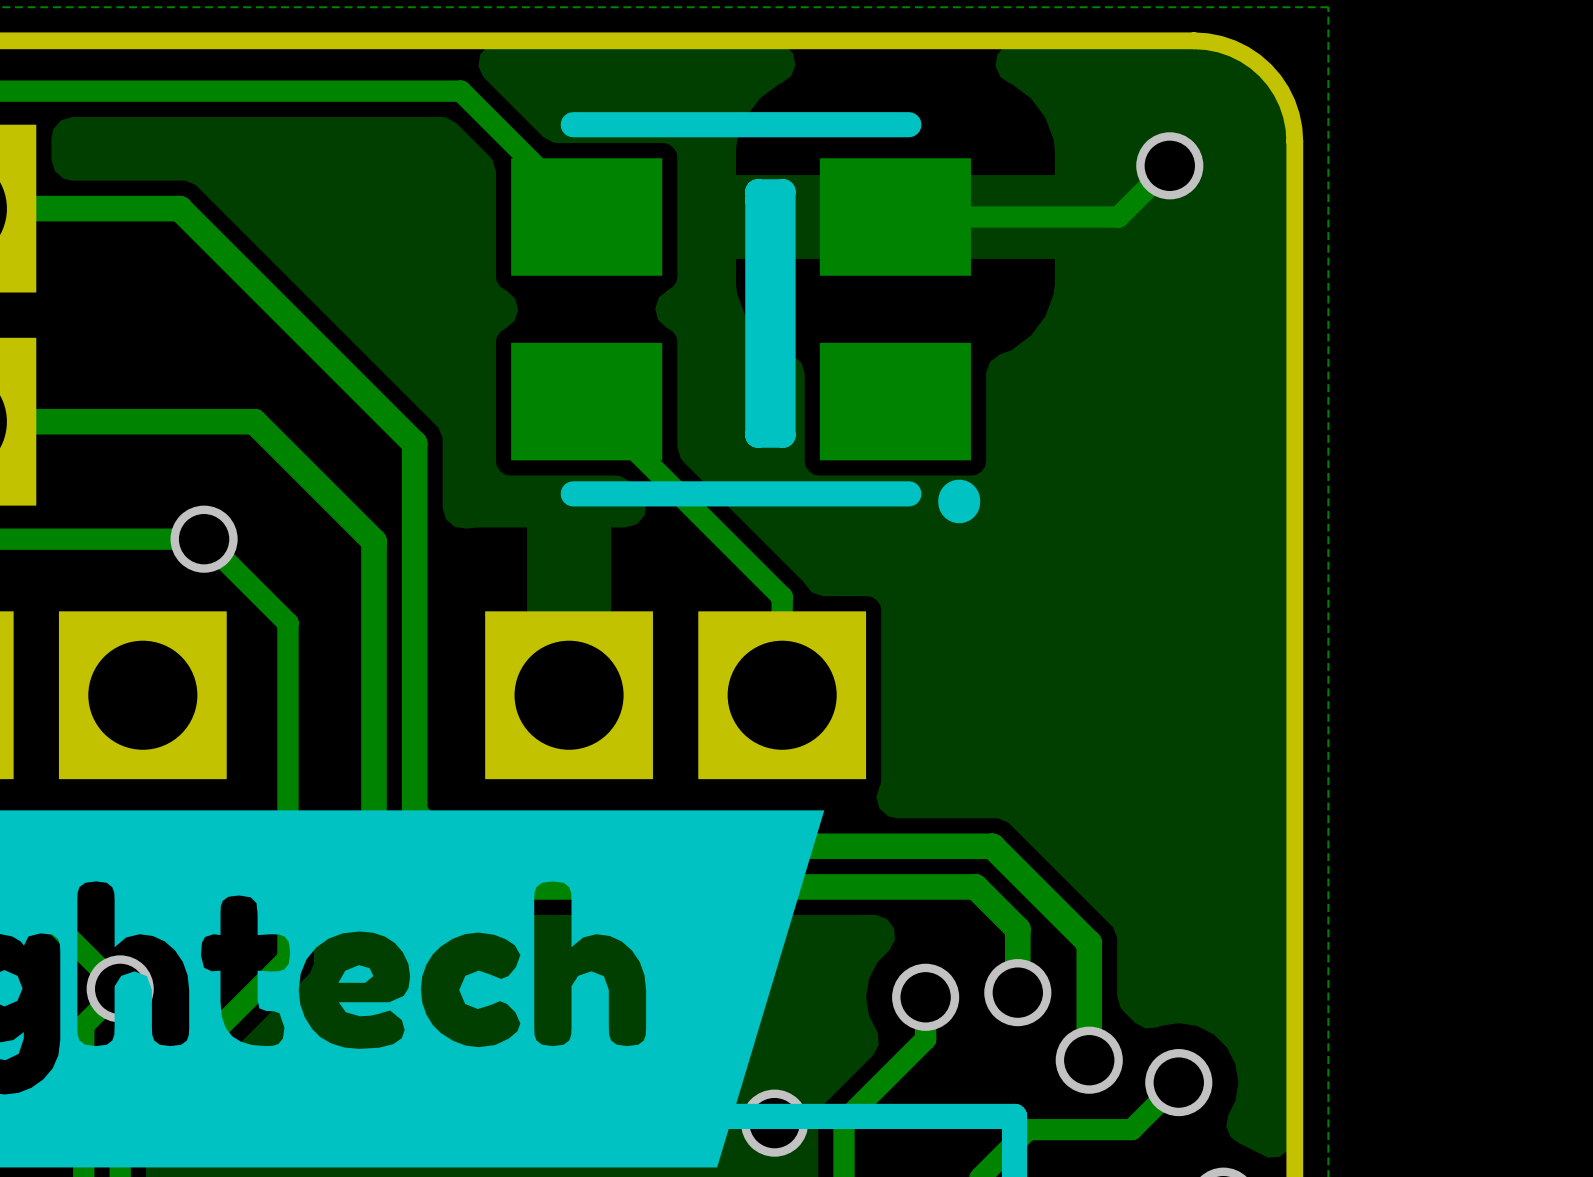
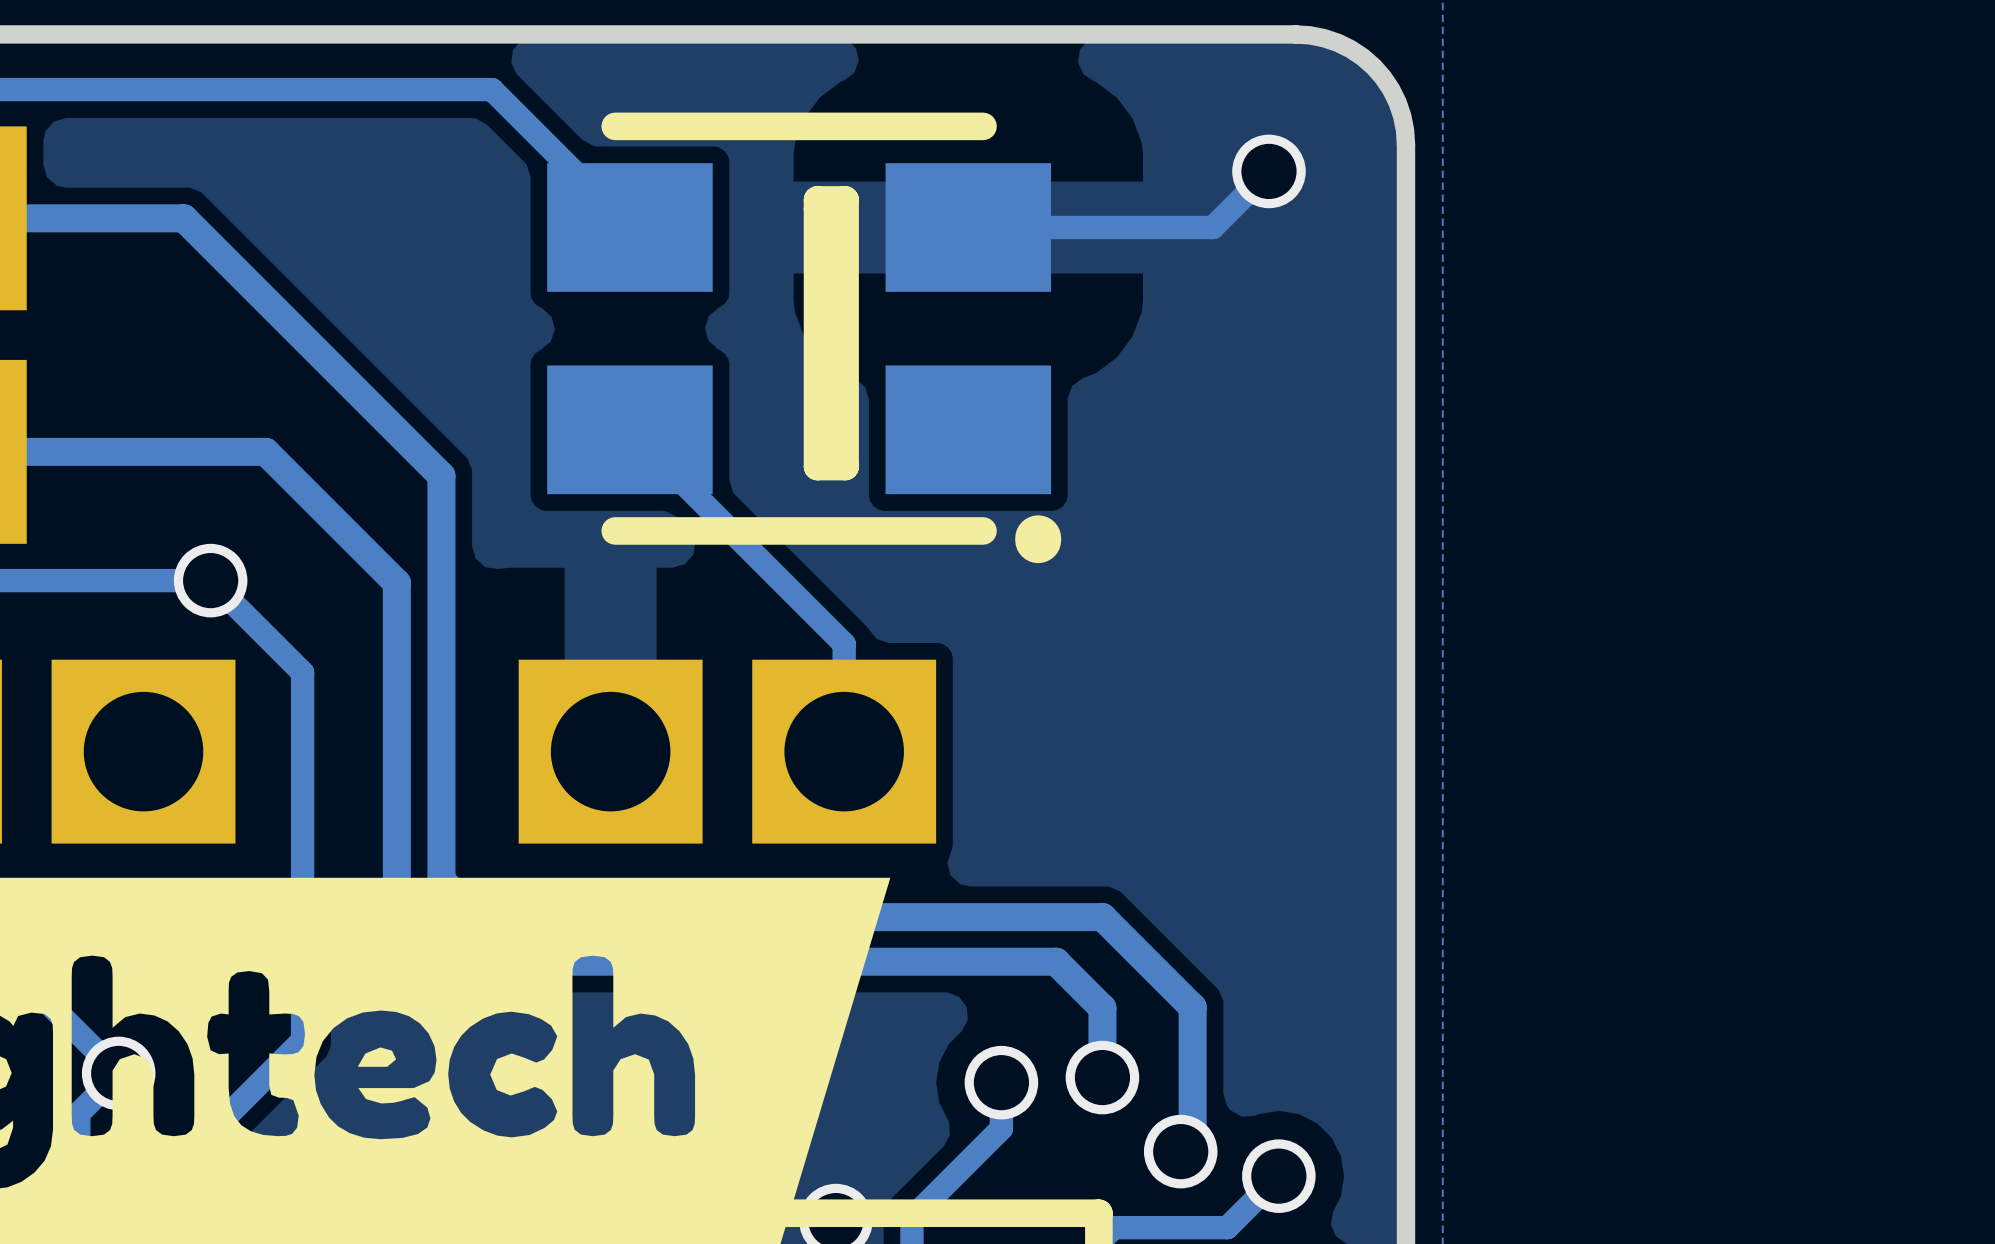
track: (992, 846) (1089, 943) (1089, 1060) -> (1074, 917) (1102, 917) (1192, 1007) (1192, 1139) (1180, 1151)

